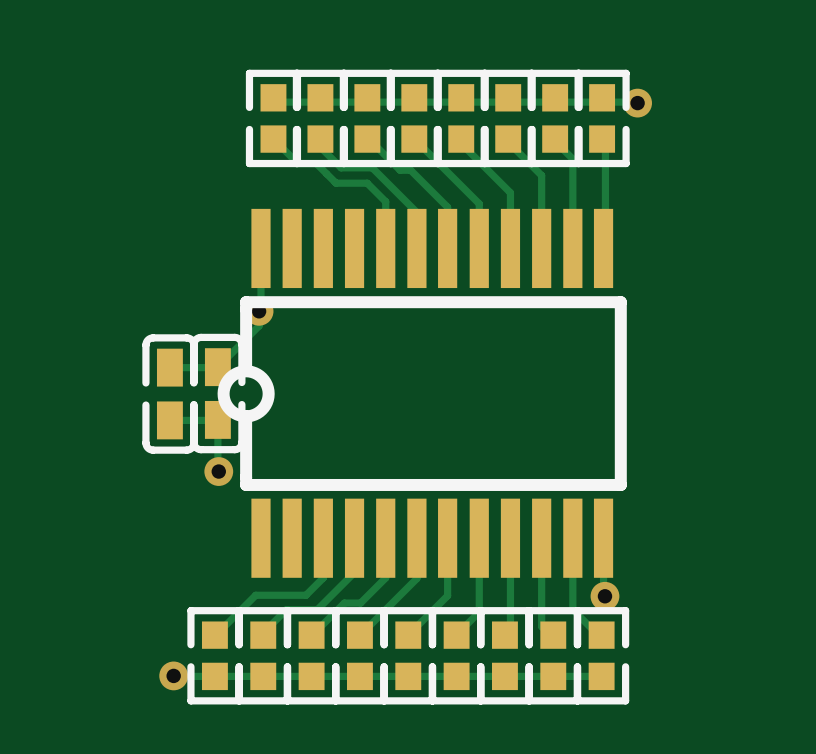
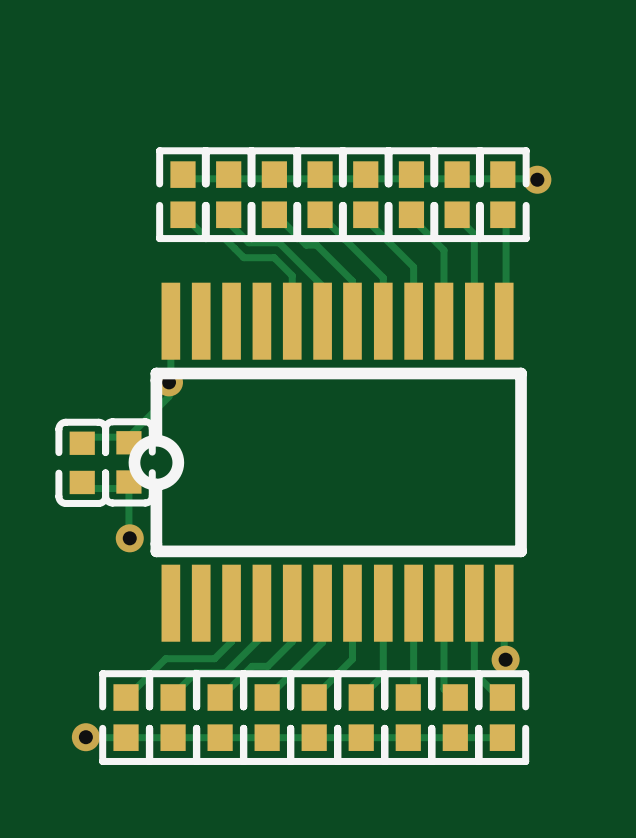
part footprint: [190, 333, 246, 454] -> [102, 418, 156, 507]
part footprint: [142, 334, 198, 454] -> [55, 418, 110, 507]

